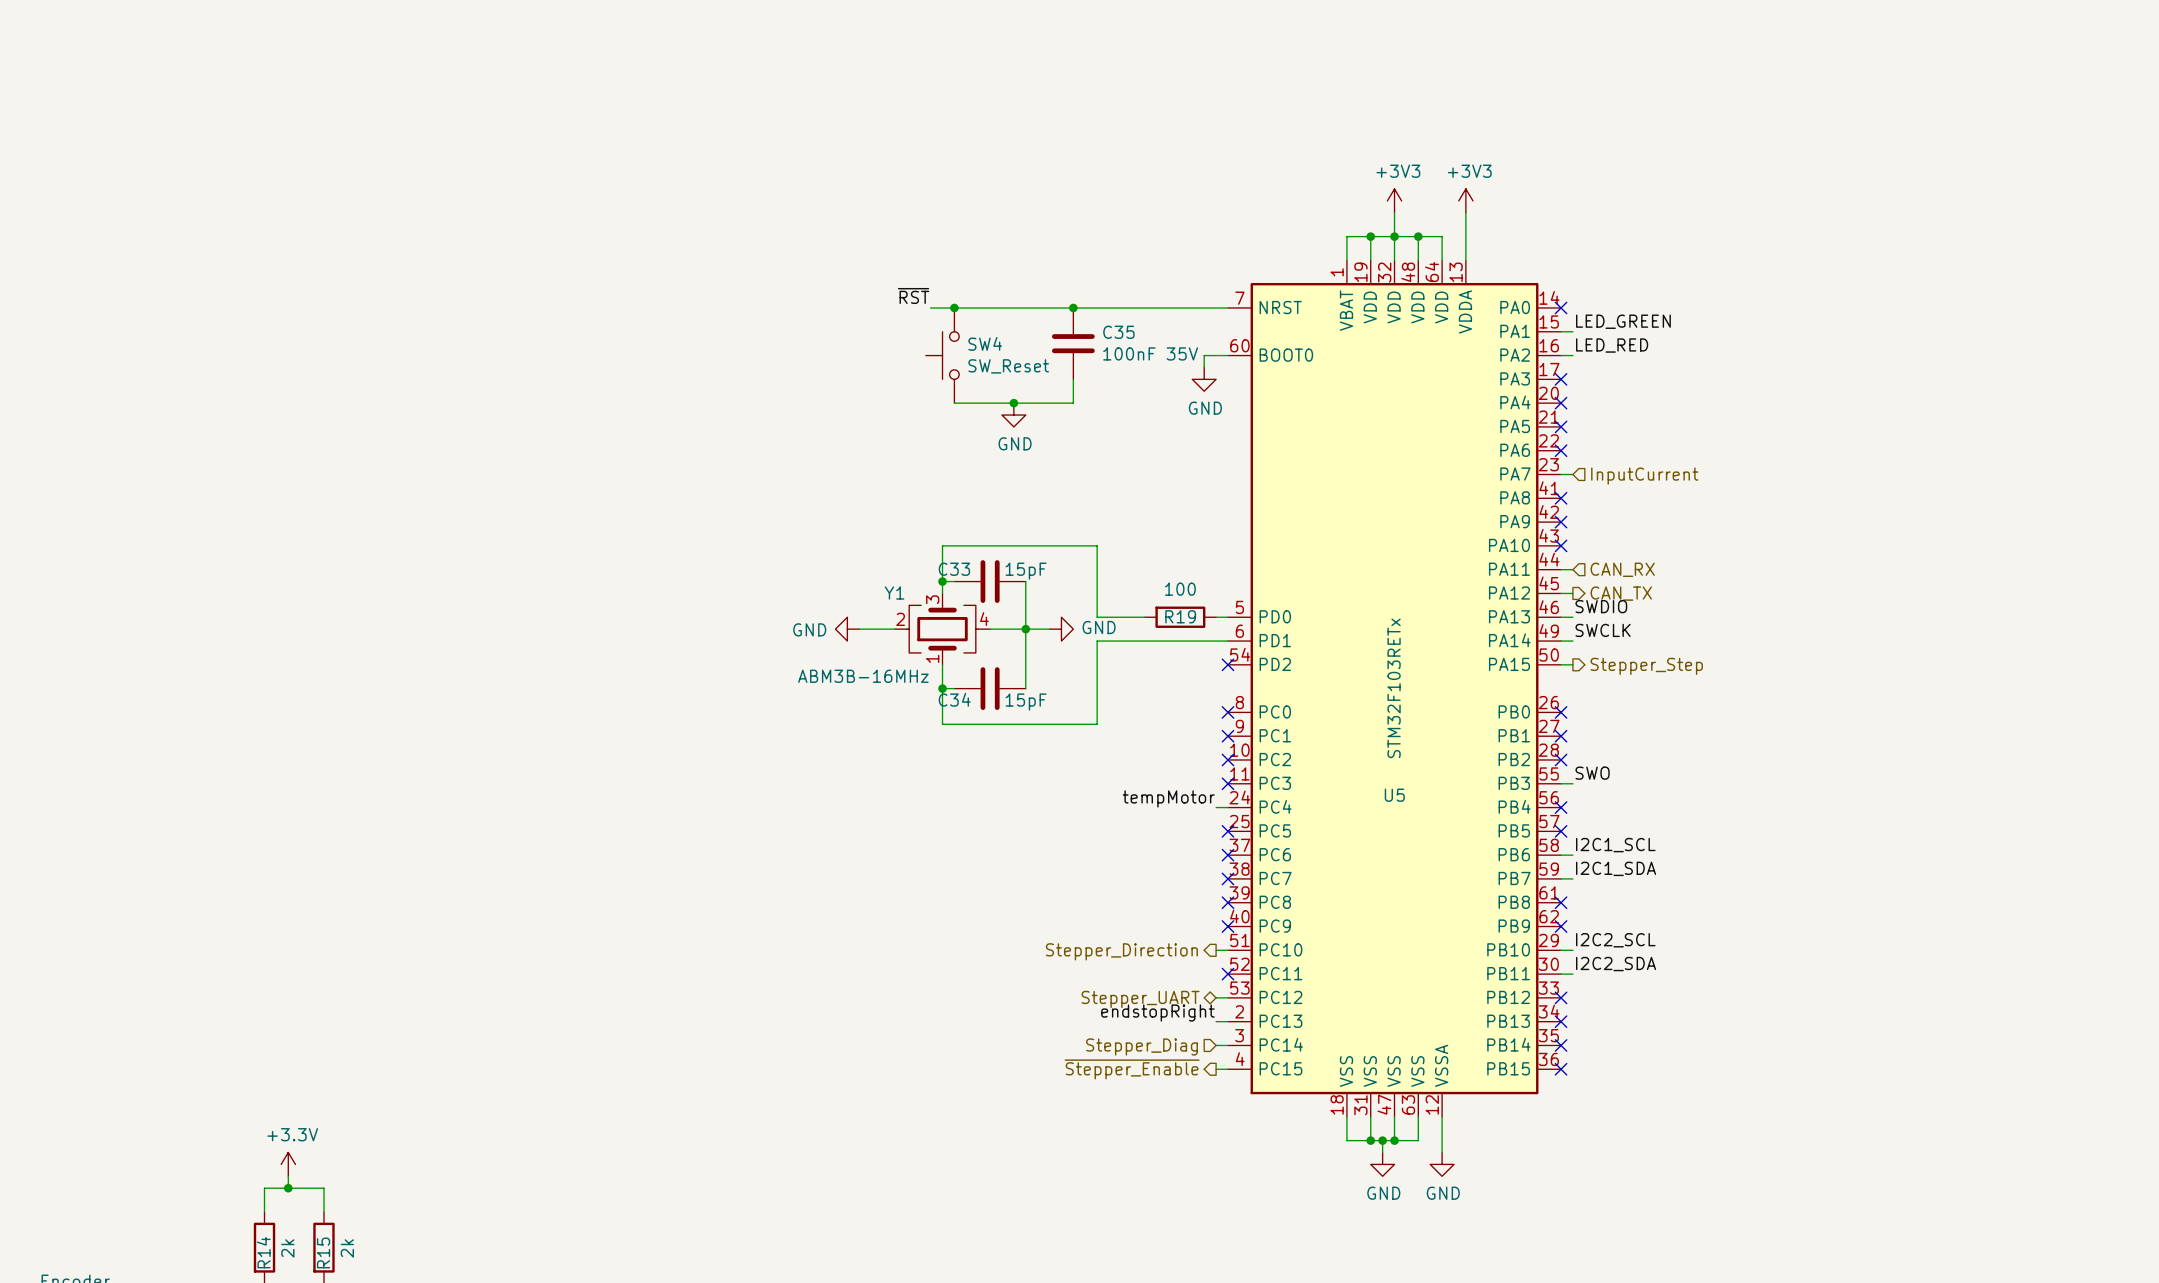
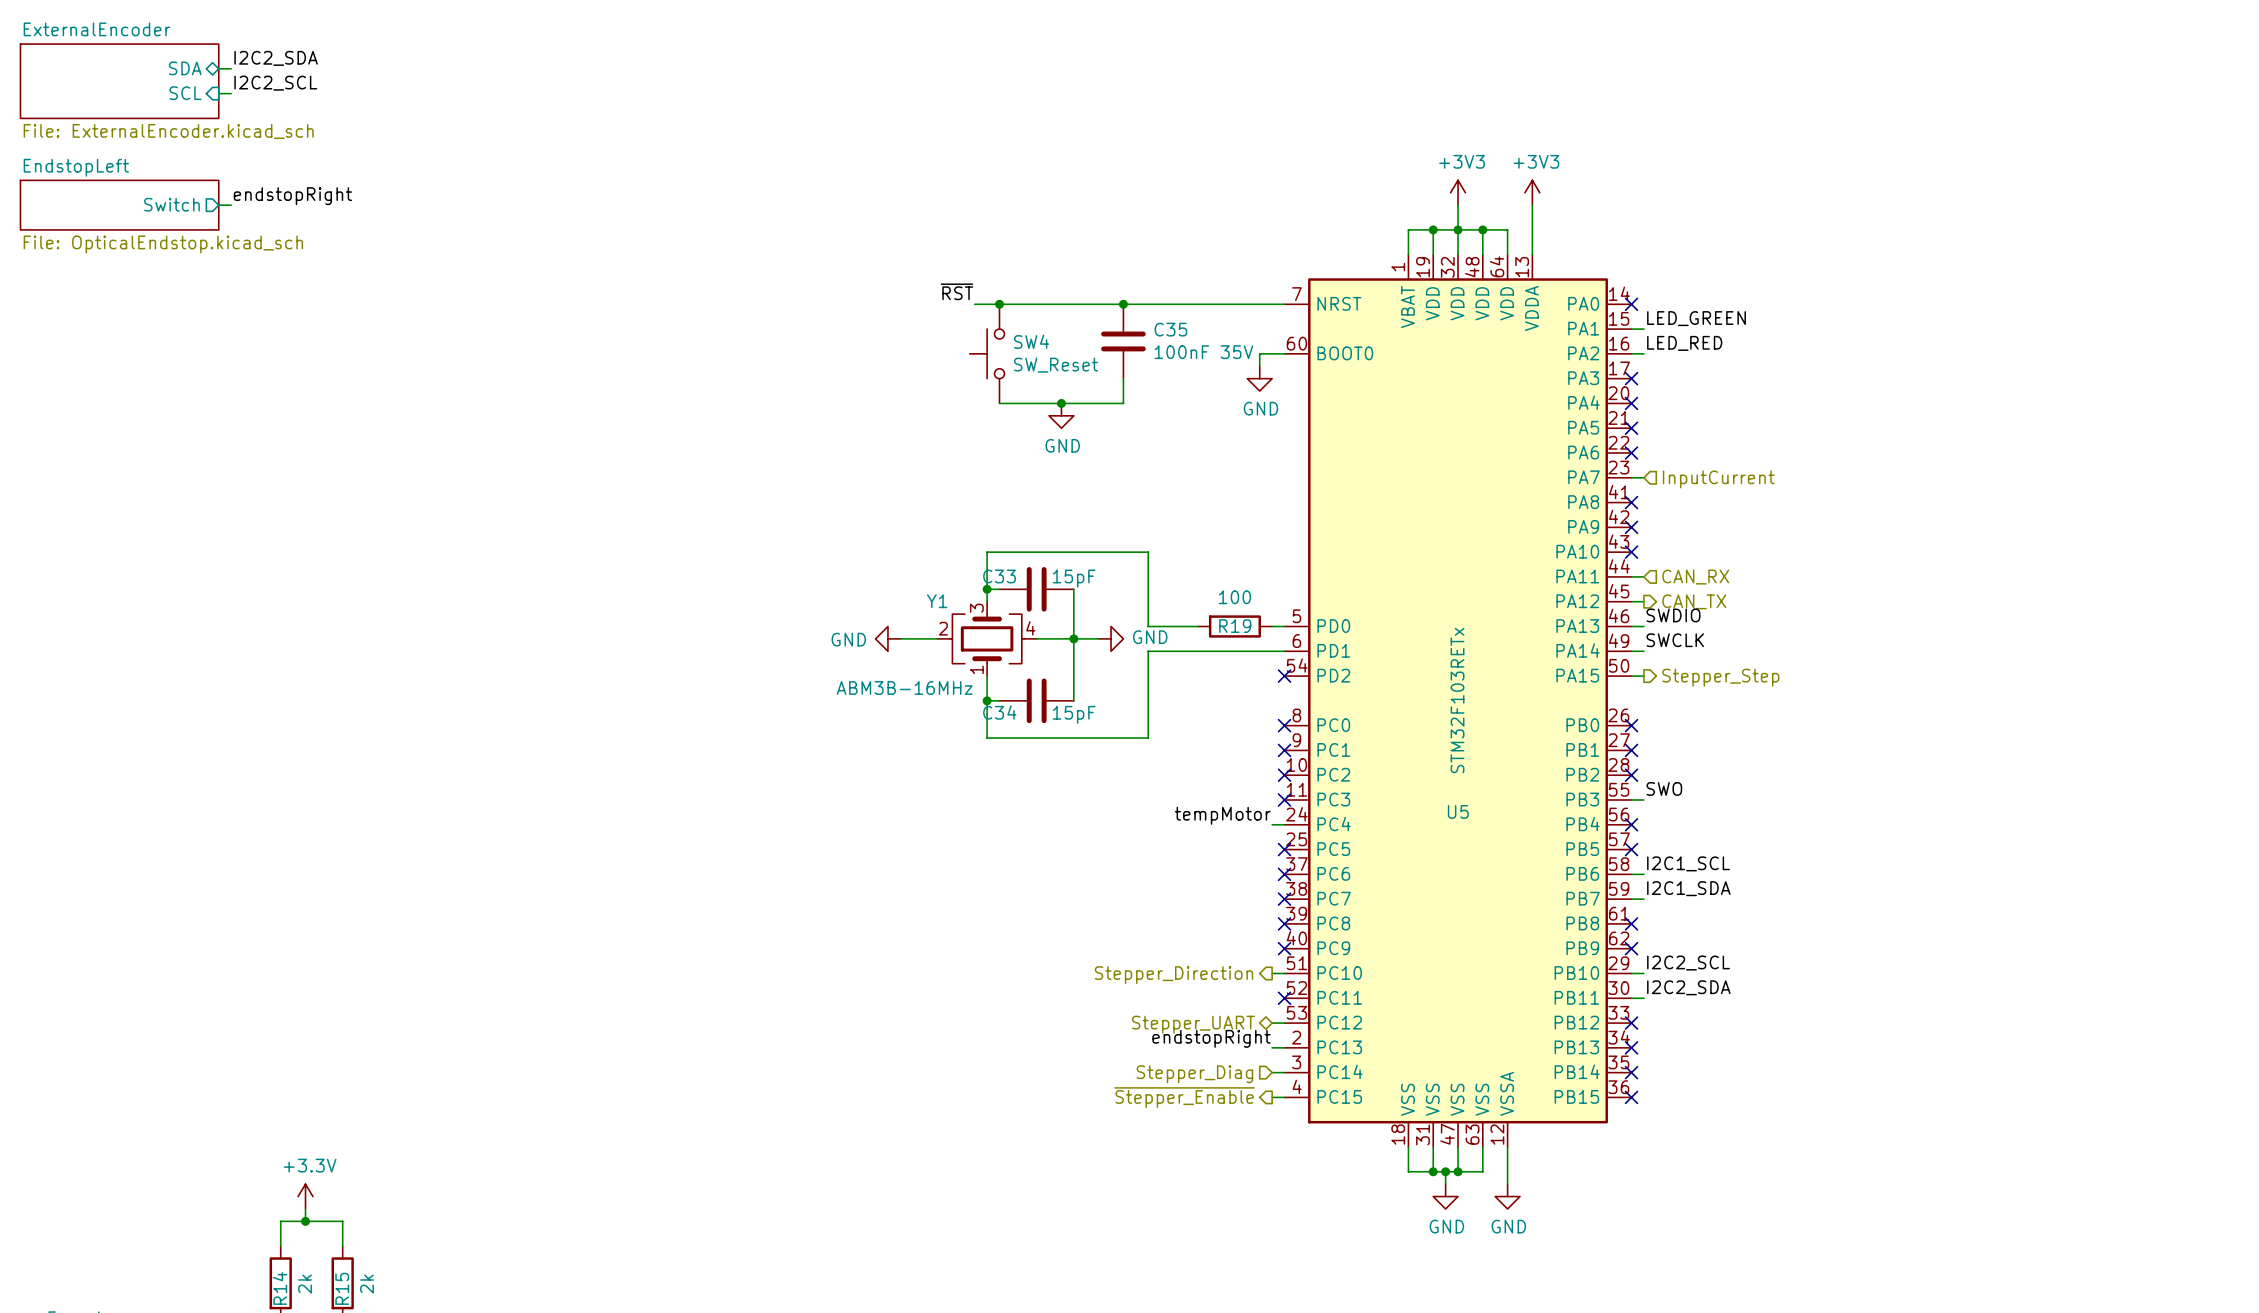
label: none -> I2C2_SDA (276, 58)
sheet pin: none -> SDA (185, 68)
wire: none -> (218, 68) (231, 68)
sheet ExternalEncoder: none -> File: ExternalEncoder.kicad_sch (119, 81)
label: none -> I2C2_SCL (275, 83)
sheet pin: none -> SCL (185, 93)
wire: none -> (218, 93) (231, 93)
label: none -> endstopRight (292, 196)
sheet EndstopLeft: none -> File: OpticalEndstop.kicad_sch (119, 205)
sheet pin: none -> Switch (171, 204)
wire: none -> (218, 205) (231, 205)

